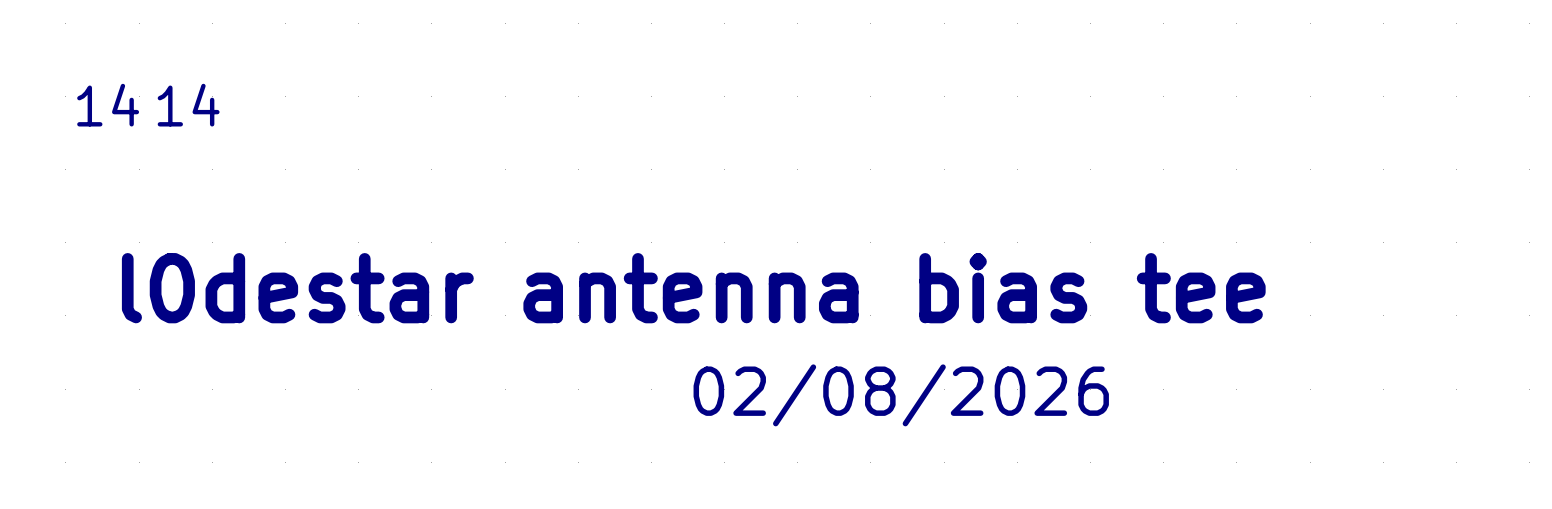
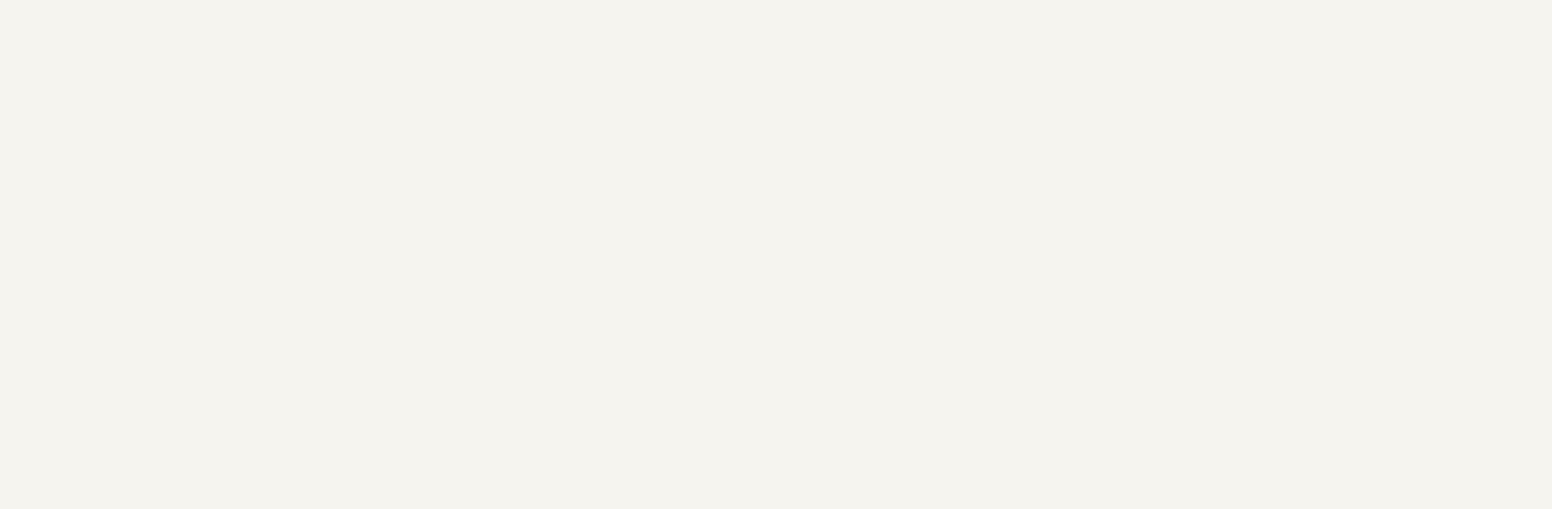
text: 14 (108, 105) -> none
text: 14 (188, 105) -> none
text: l0destar antenna bias tee (693, 288) -> none
text: 02/08/2026 (901, 395) -> none

